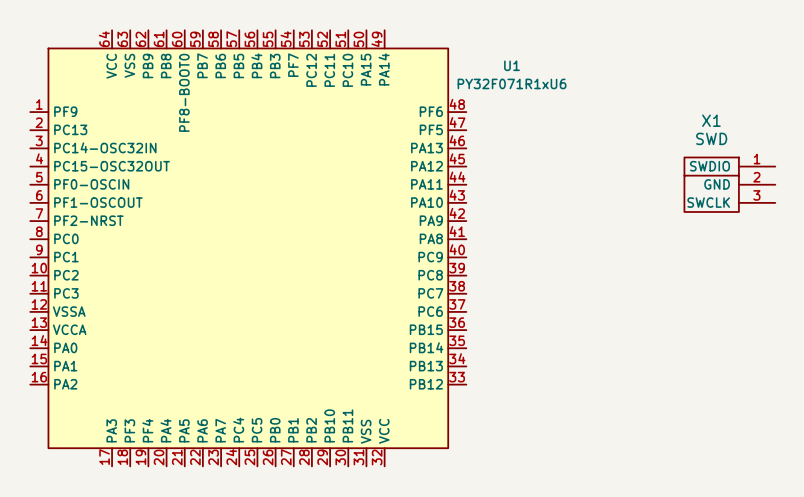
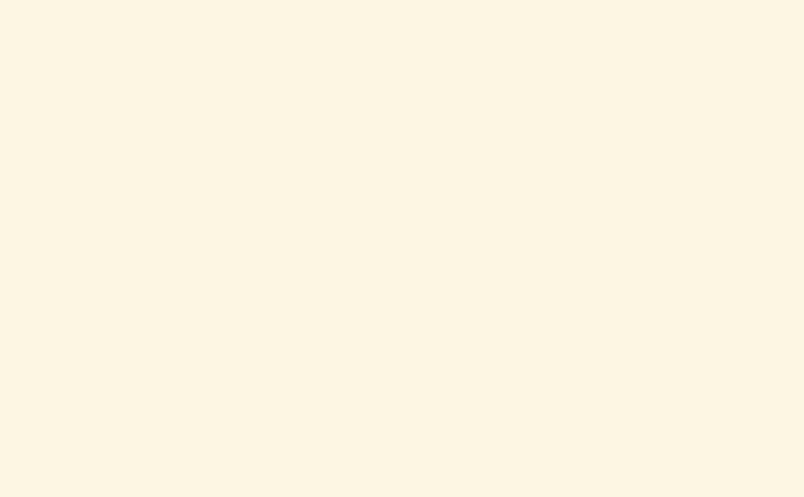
X1: SWD (729, 184) -> none
U1: PY32F071R1xU6 (248, 248) -> none

